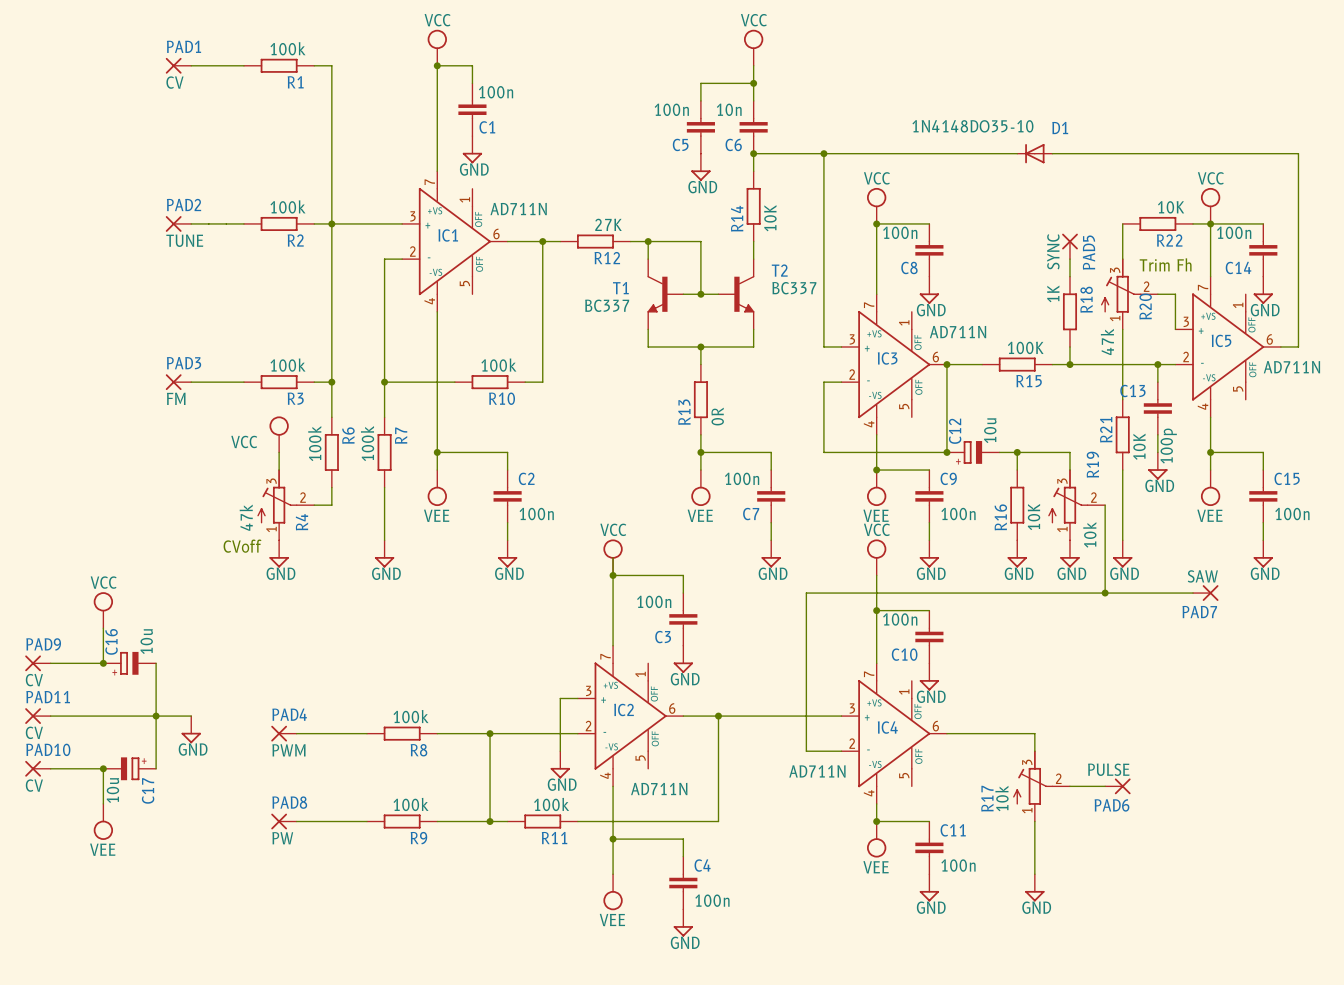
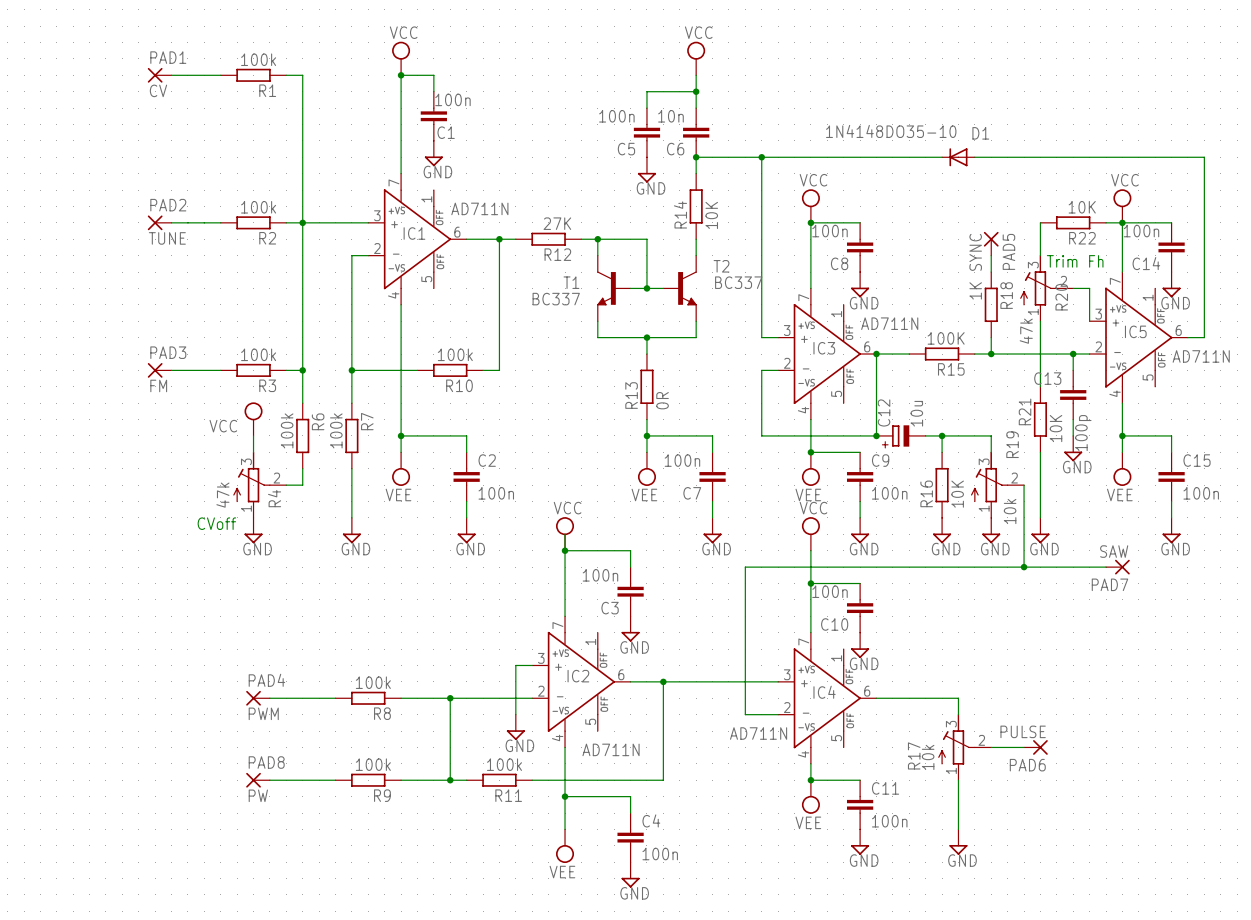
power symbol: VCC (103, 610) -> none
wire: (103, 628) (103, 663) (50, 663) -> none
PAD9: CV (37, 663) -> none
junction: (103, 663) -> none
C16: 10u (129, 663) -> none
wire: (156, 663) (156, 768) -> none
PAD11: CV (37, 716) -> none
wire: (50, 716) (191, 716) -> none
junction: (156, 716) -> none
power symbol: GND (191, 729) -> none
PAD10: CV (37, 768) -> none
wire: (50, 768) (103, 768) (103, 803) -> none
junction: (103, 768) -> none
C17: 10u (129, 768) -> none
power symbol: VEE (103, 821) -> none

